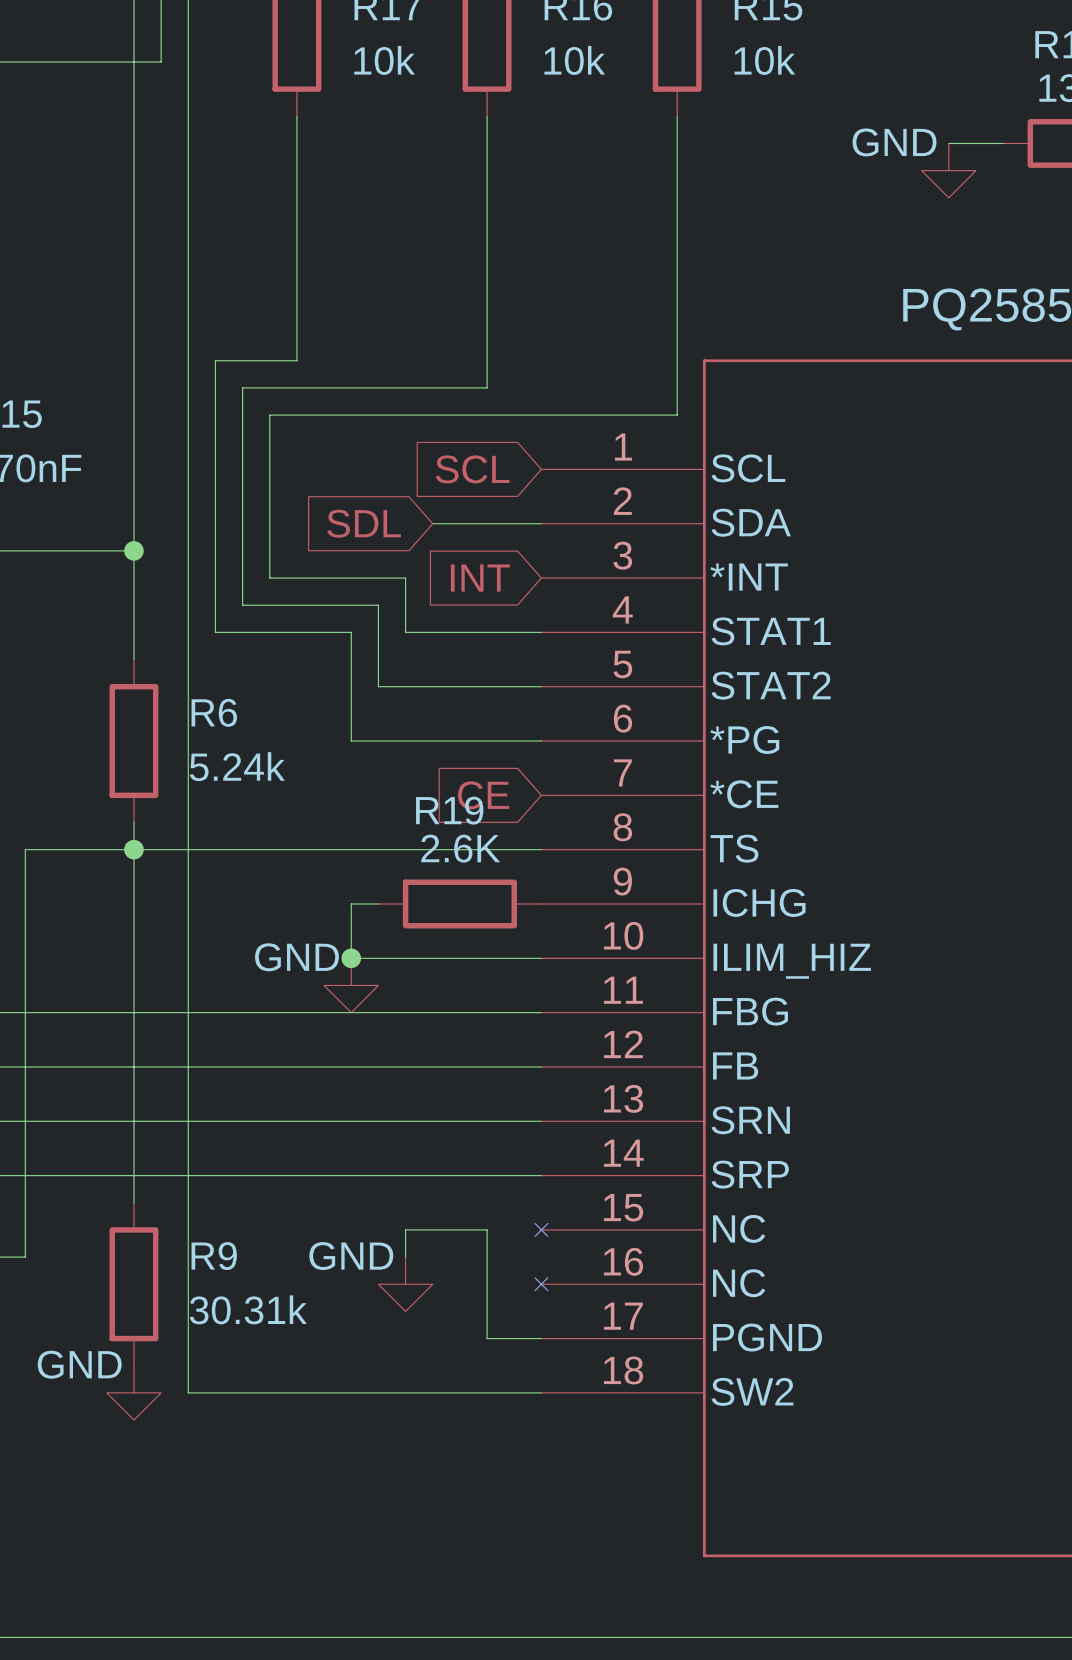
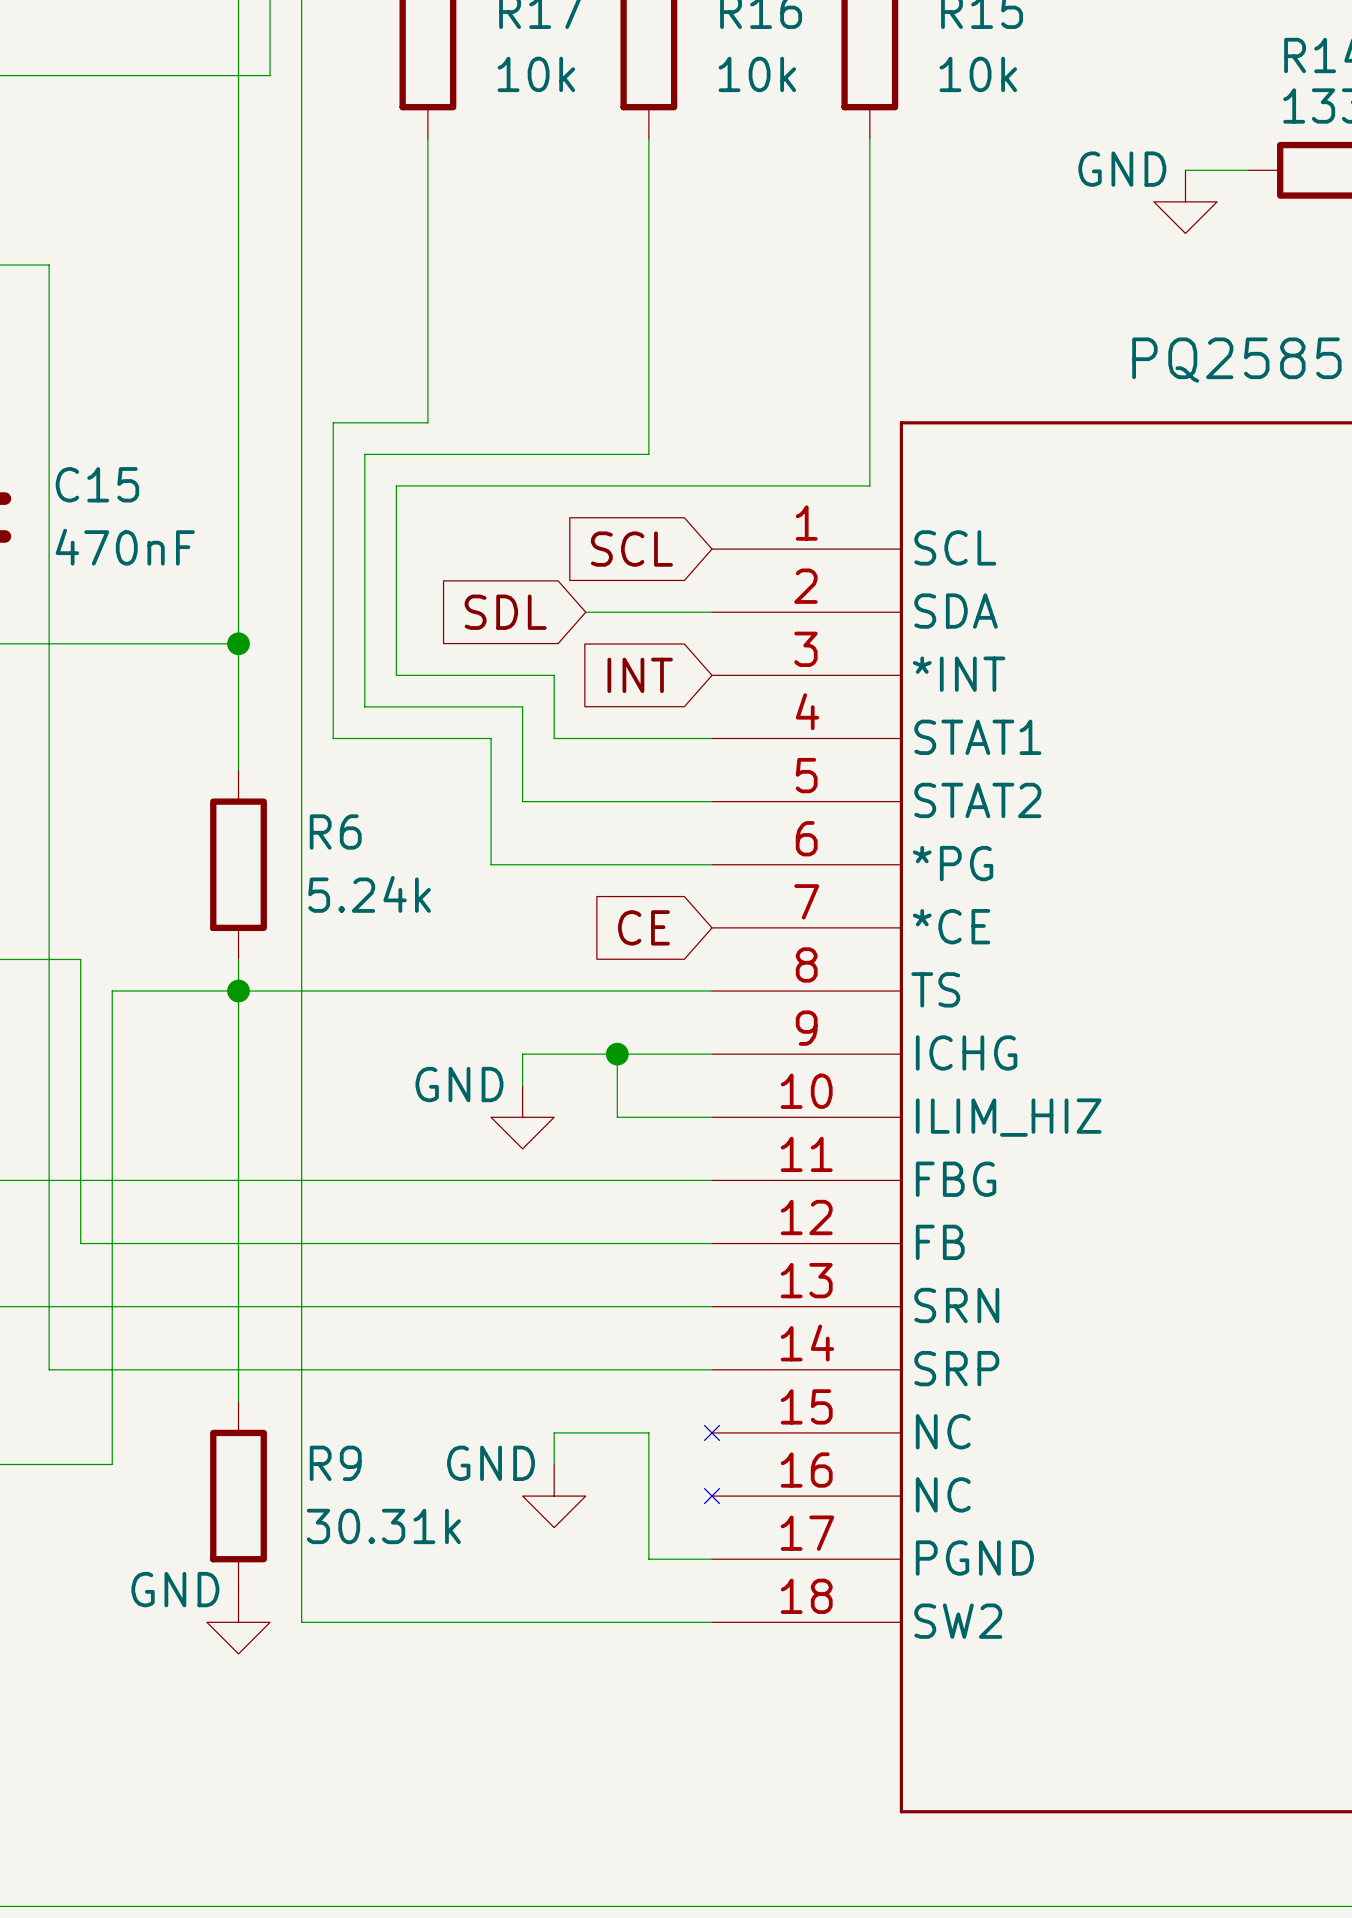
wire: (378, 903) (351, 903) (351, 958) (459, 958) -> (617, 1054) (617, 1117)
R19: 2.6K (459, 903) -> none
wire: none -> (712, 1054) (522, 1054) (522, 1085)
junction position: (351, 958) -> (617, 1054)
power symbol position: GND (351, 985) -> GND (522, 1117)

